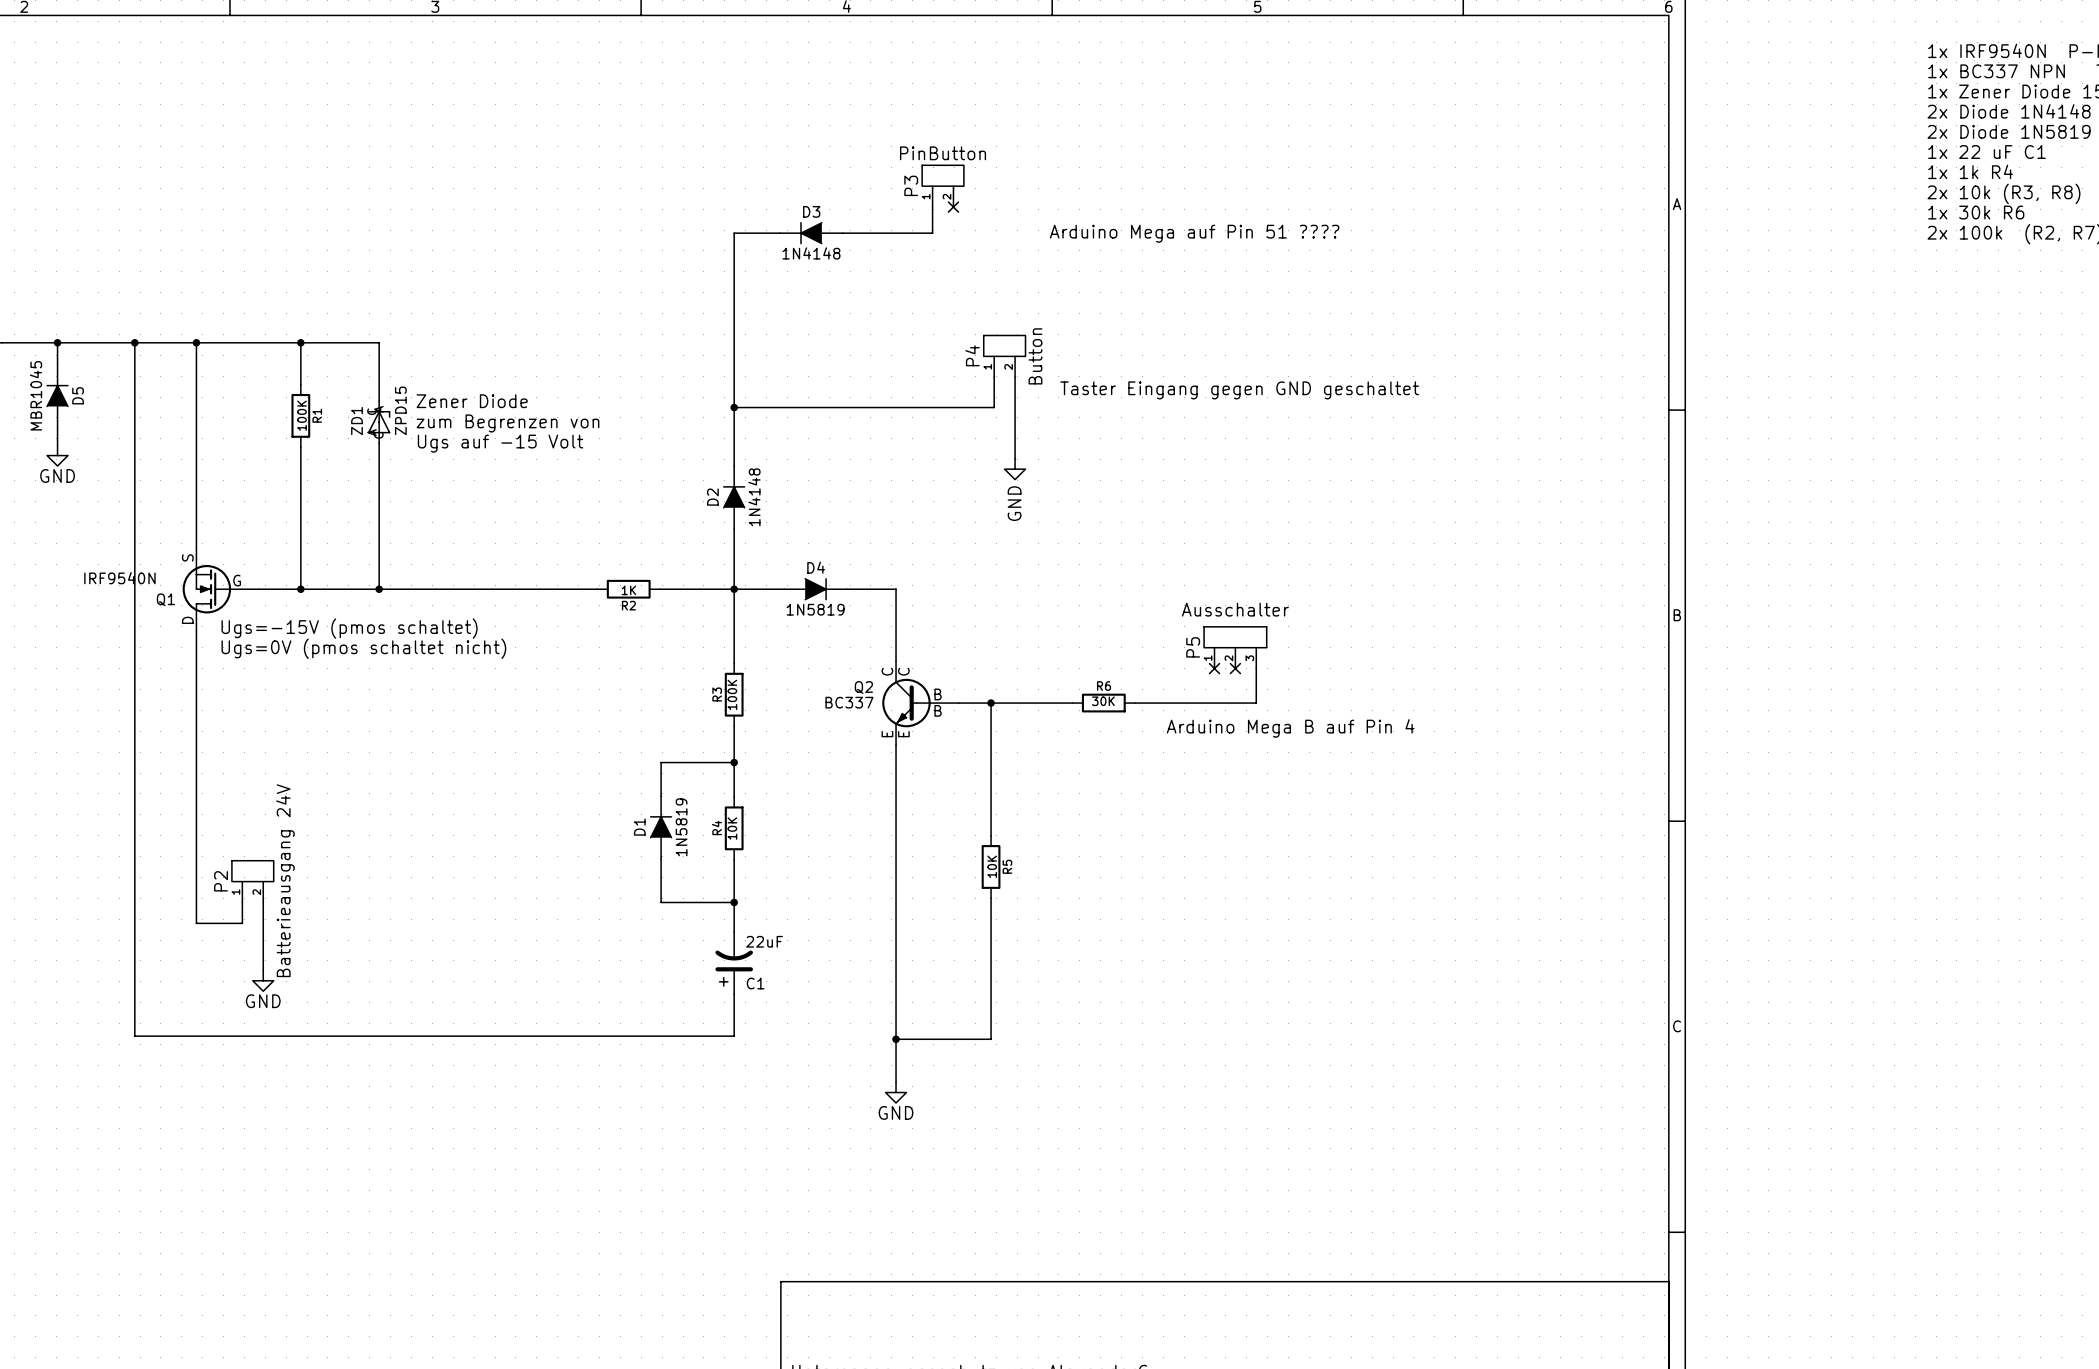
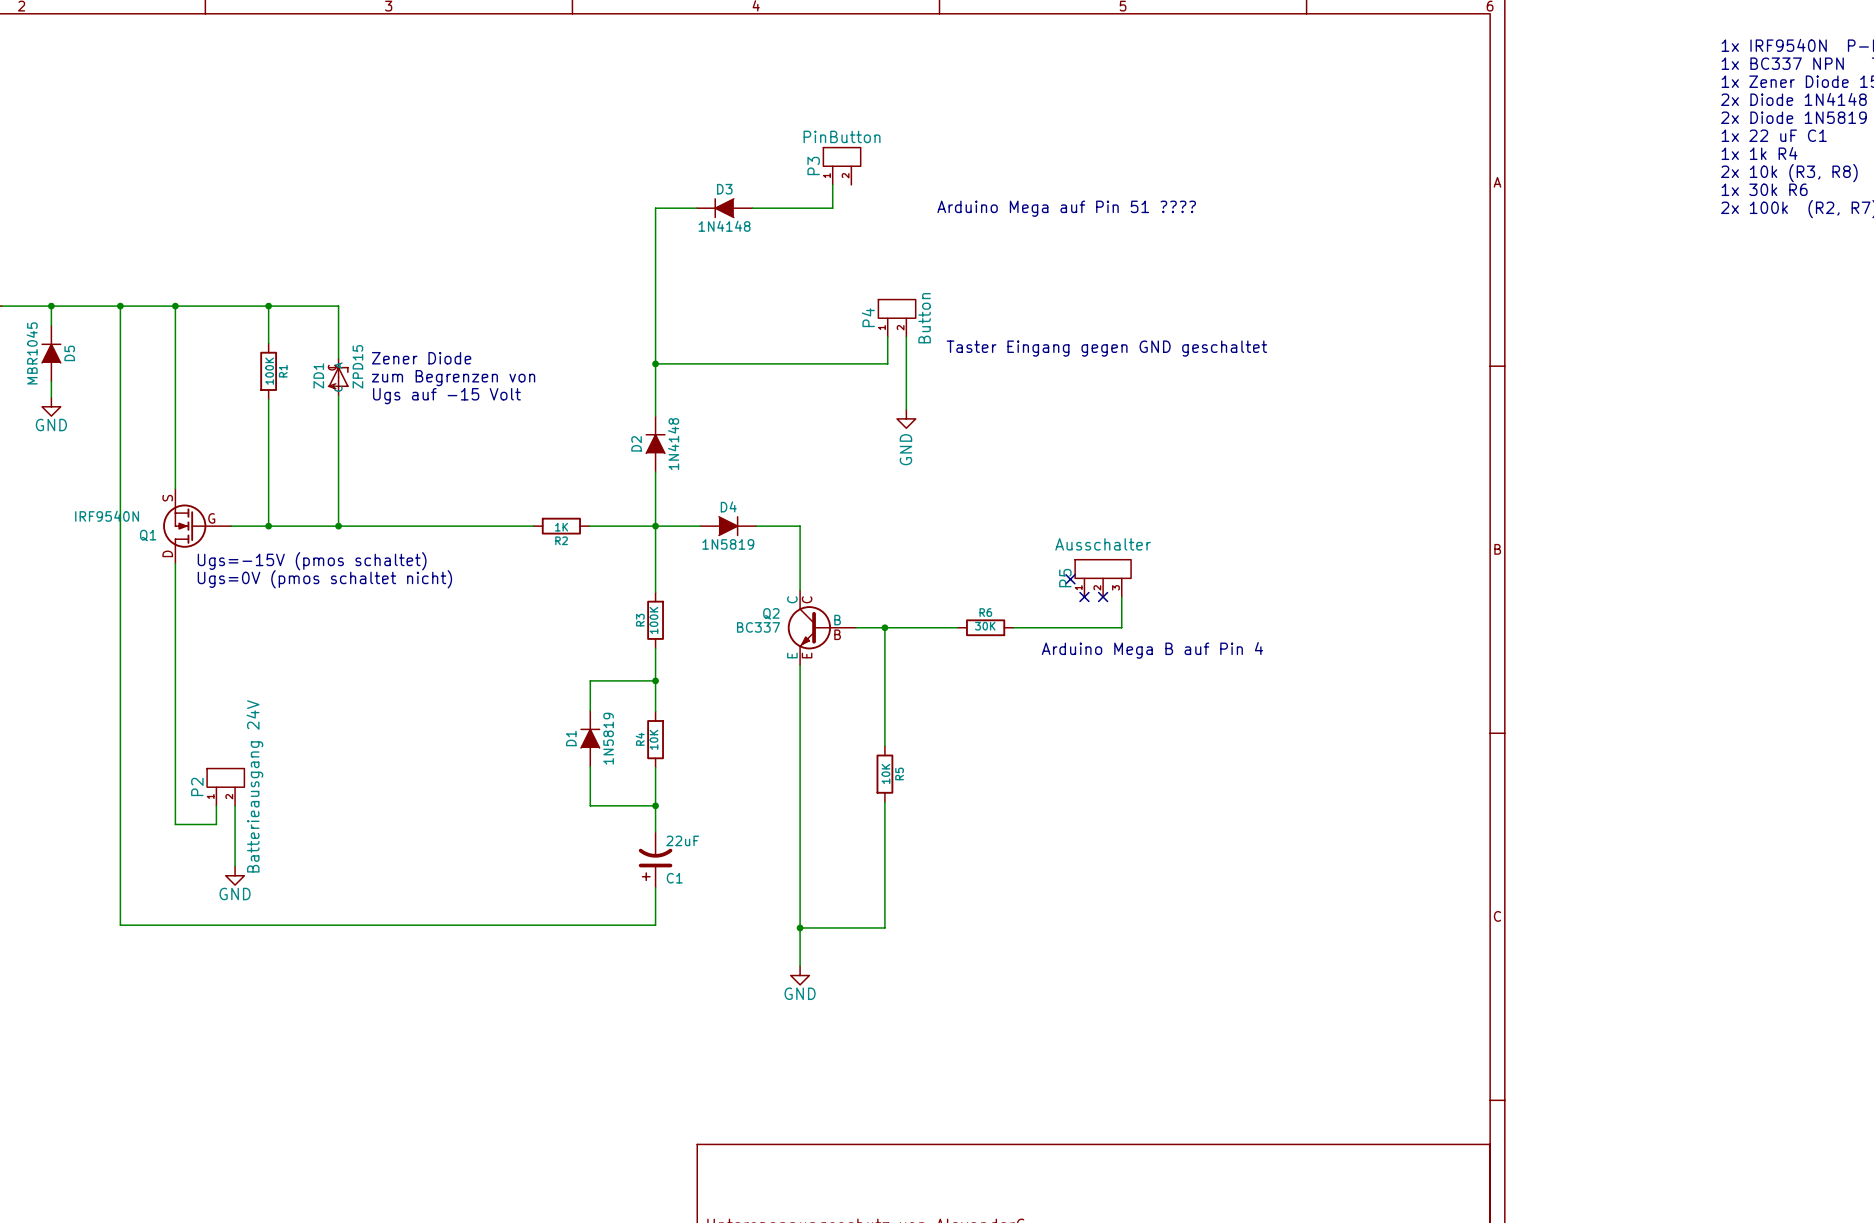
no-connect mark: (953, 207) -> none
no-connect mark: none -> (1070, 579)

